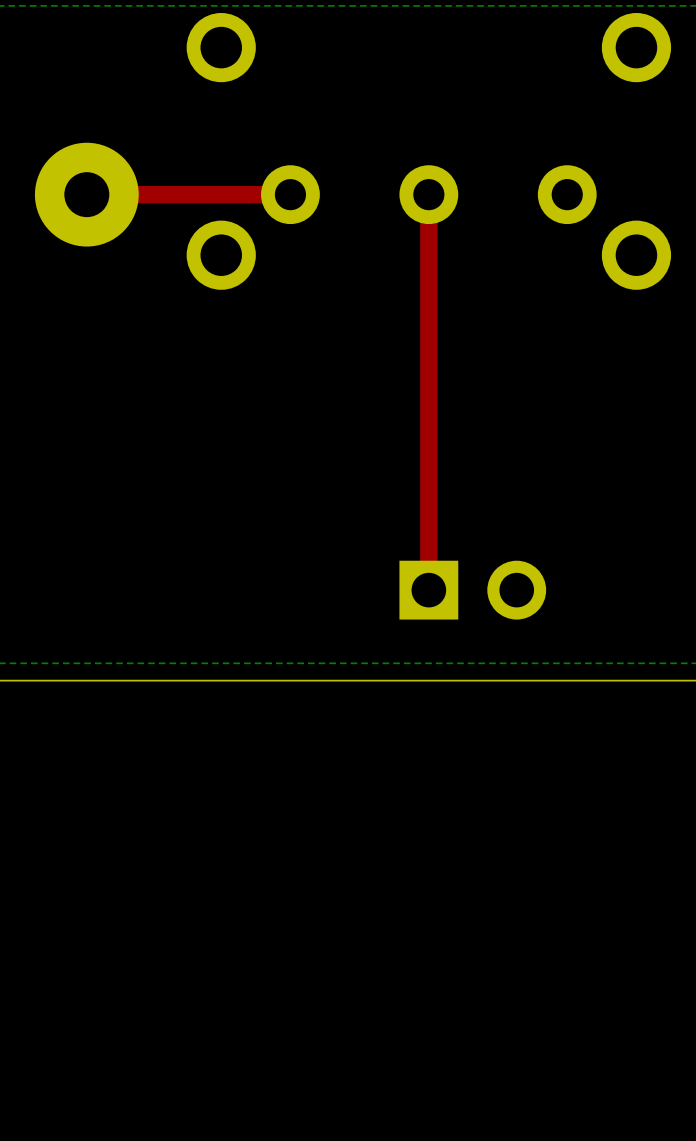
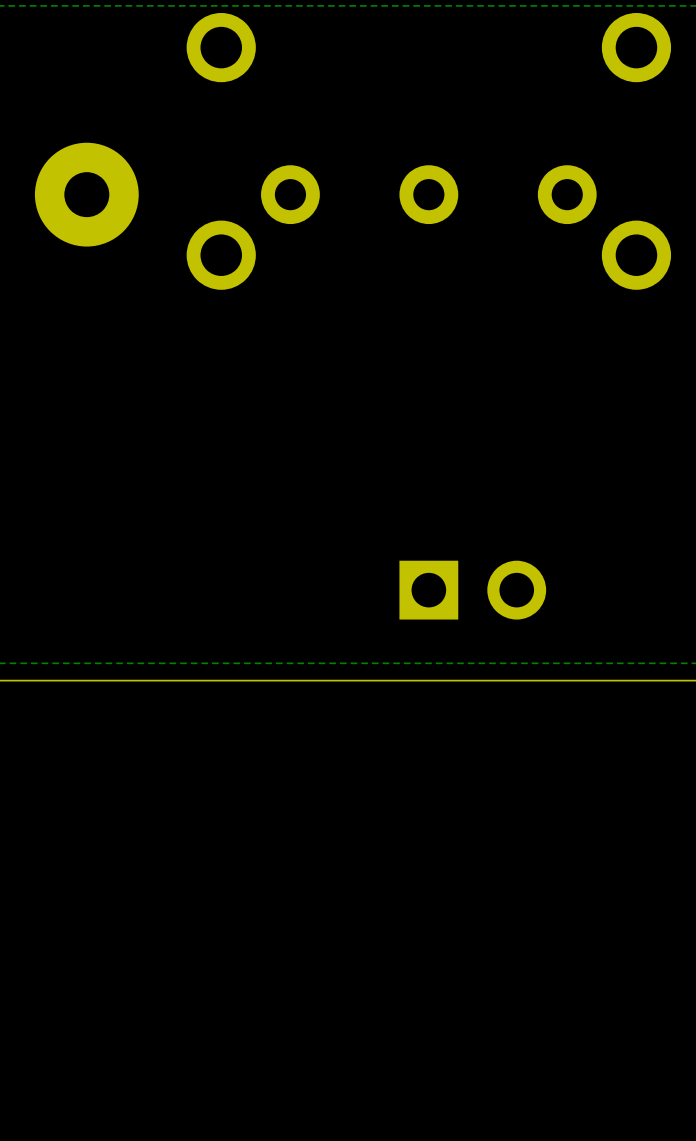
top track: (290, 194) (86, 194) -> none
top track: (428, 194) (428, 590) -> none

